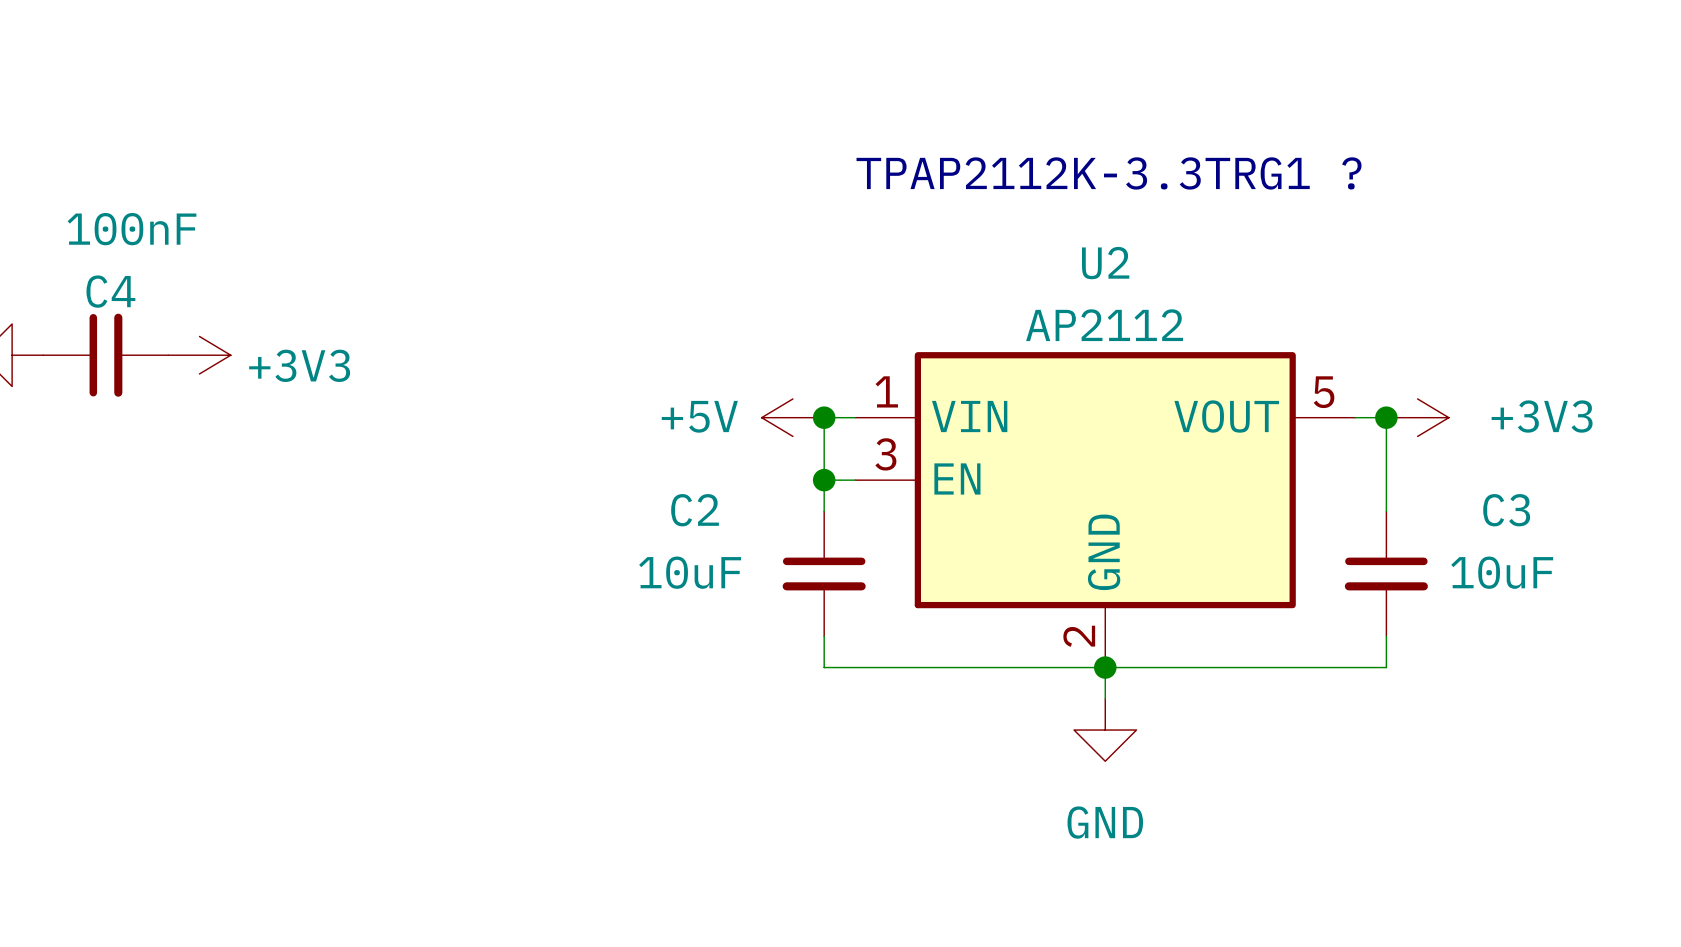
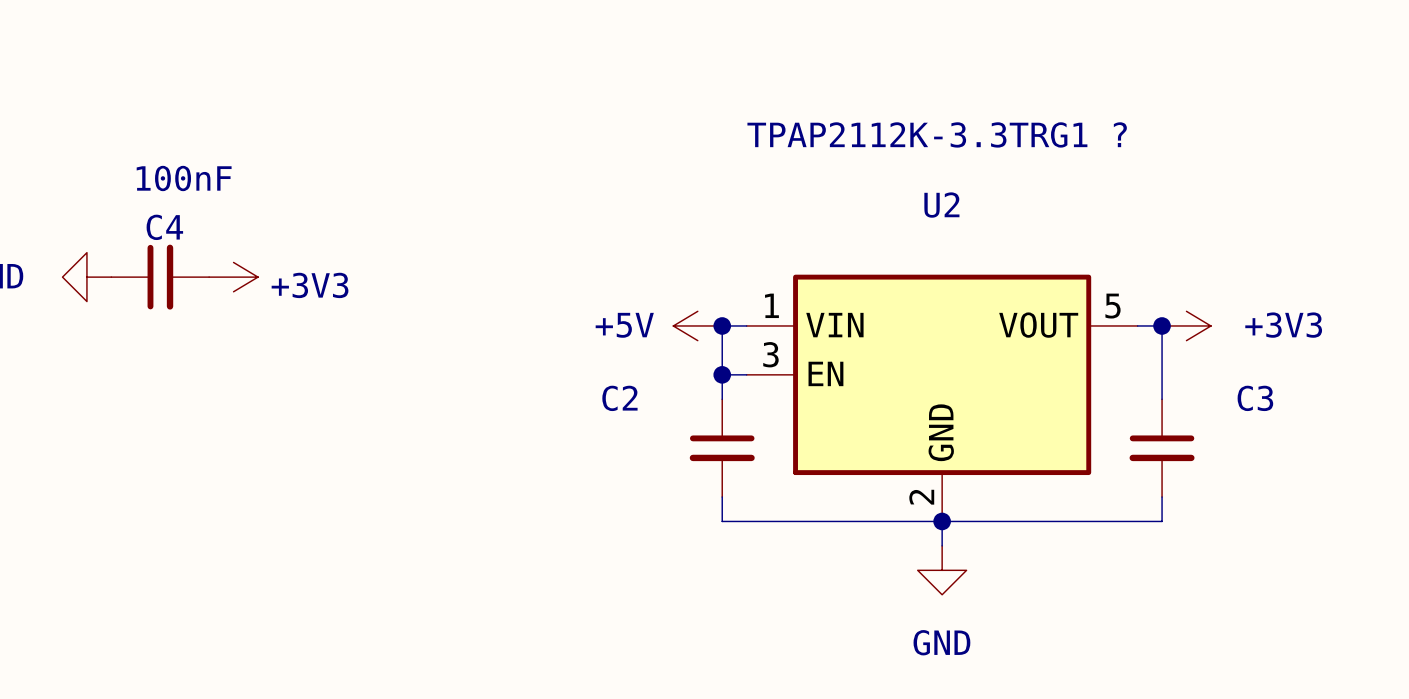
U2 value: AP2112 (1104, 325) -> none
C2 value: 10uF (690, 572) -> none
C3 value: 10uF (1502, 572) -> none

